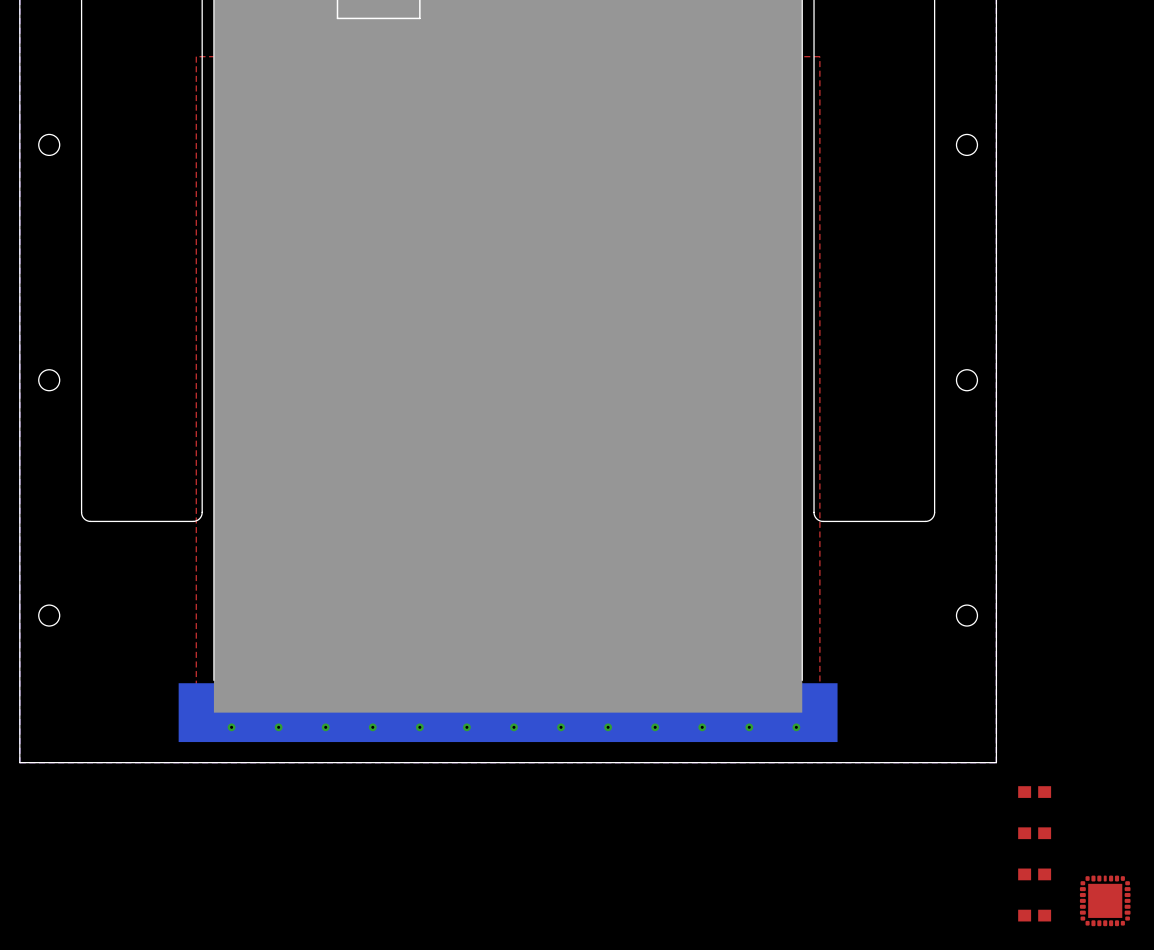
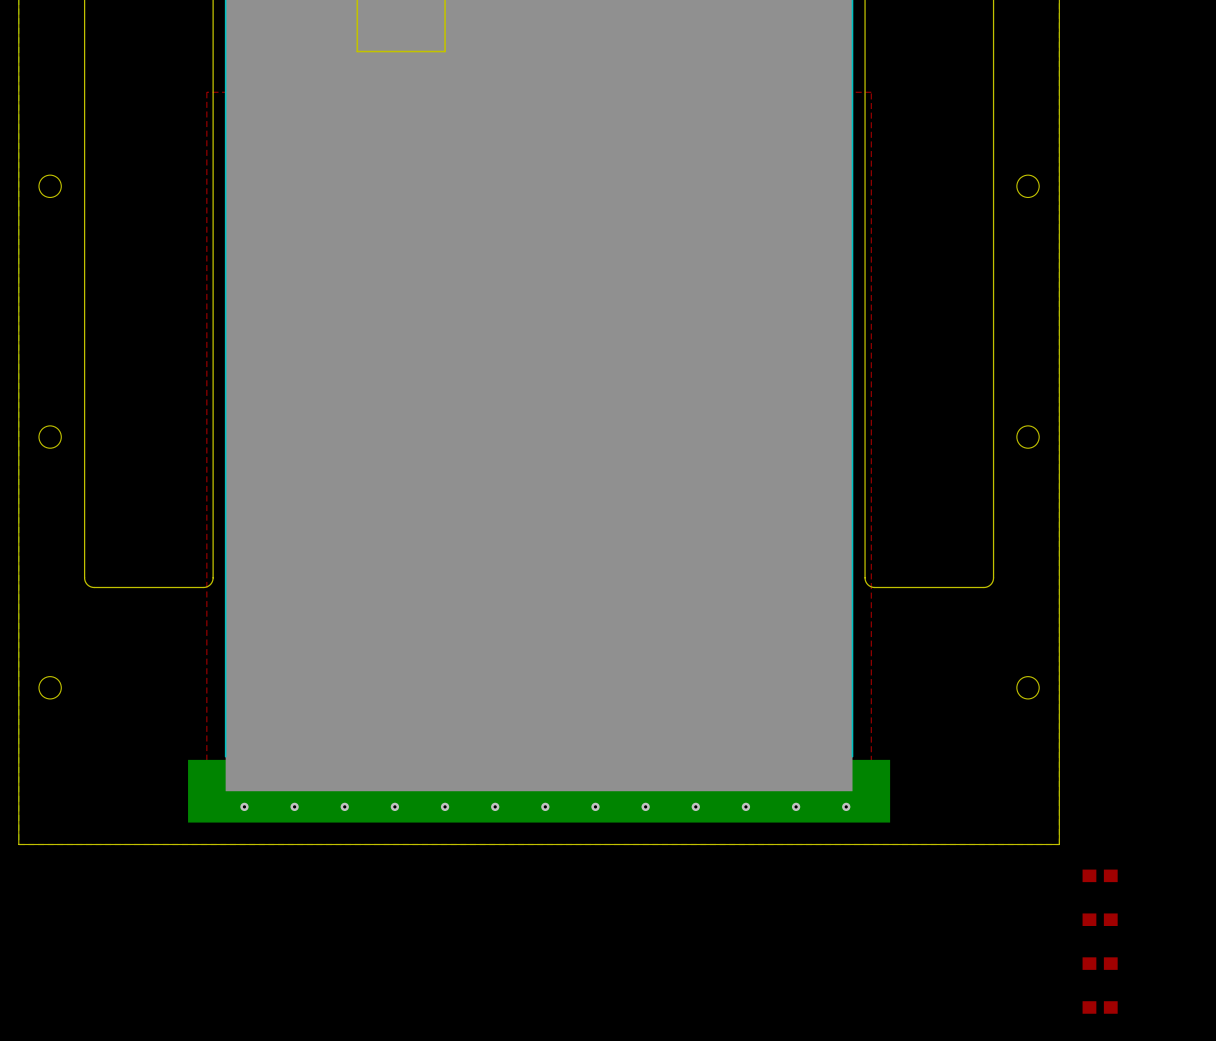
part: (1105, 900) -> none

